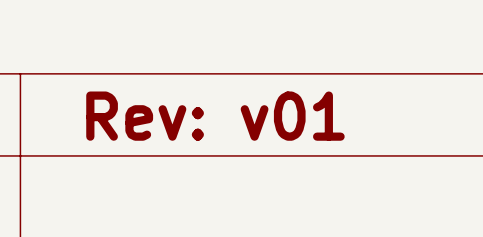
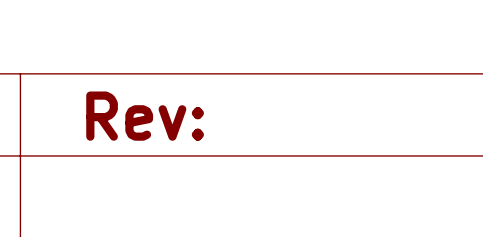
title block: Rev: v01 (215, 116) -> Rev: (145, 116)

